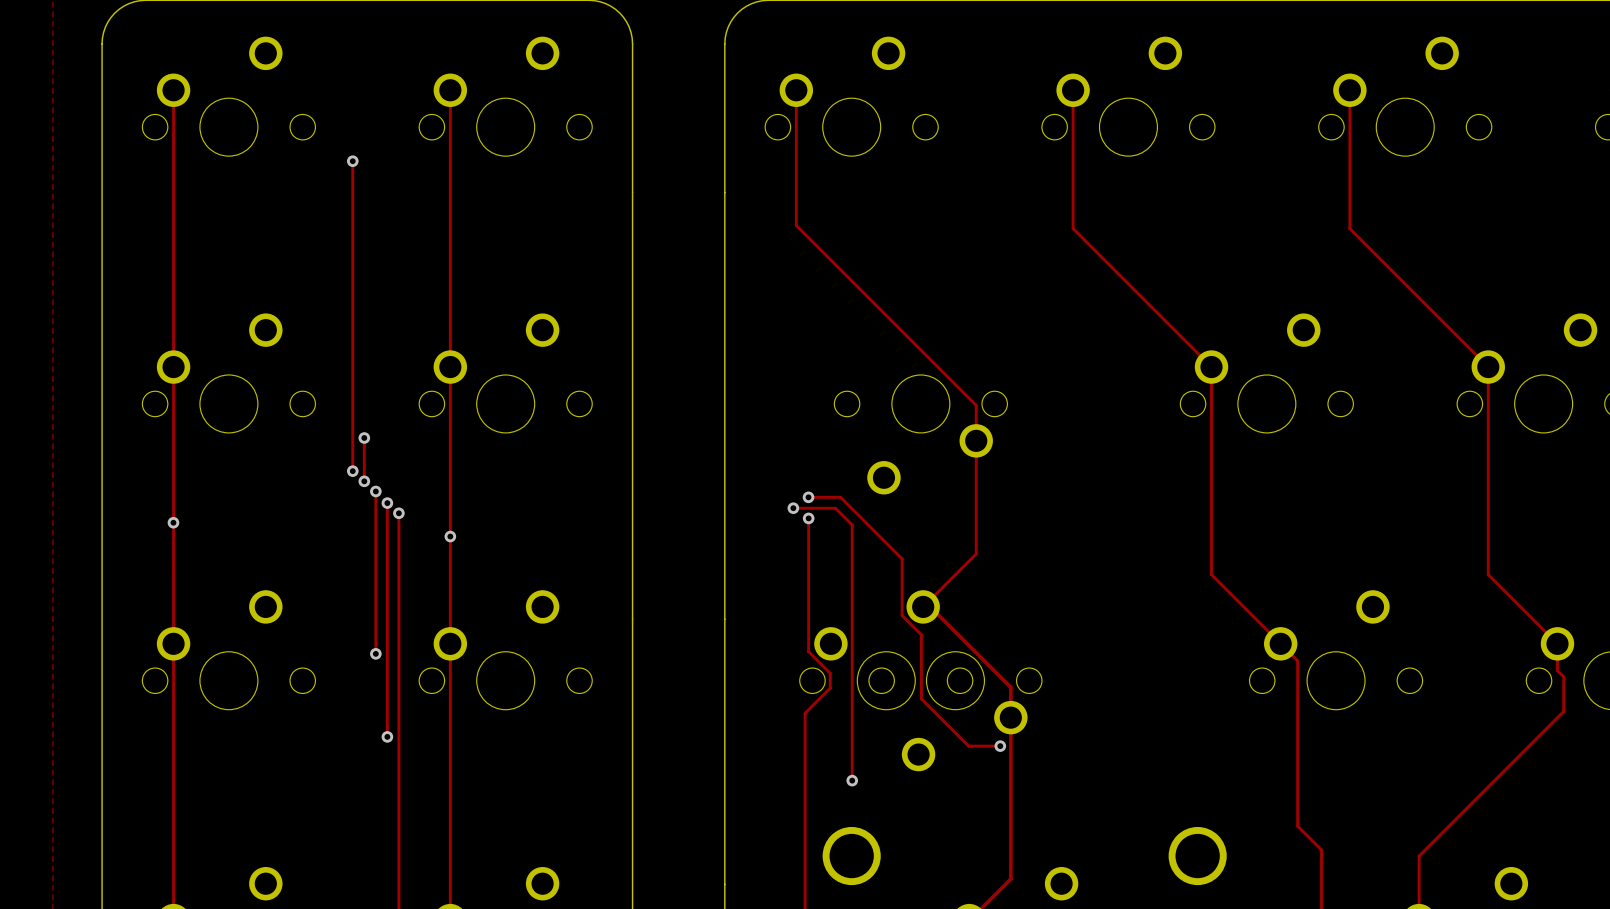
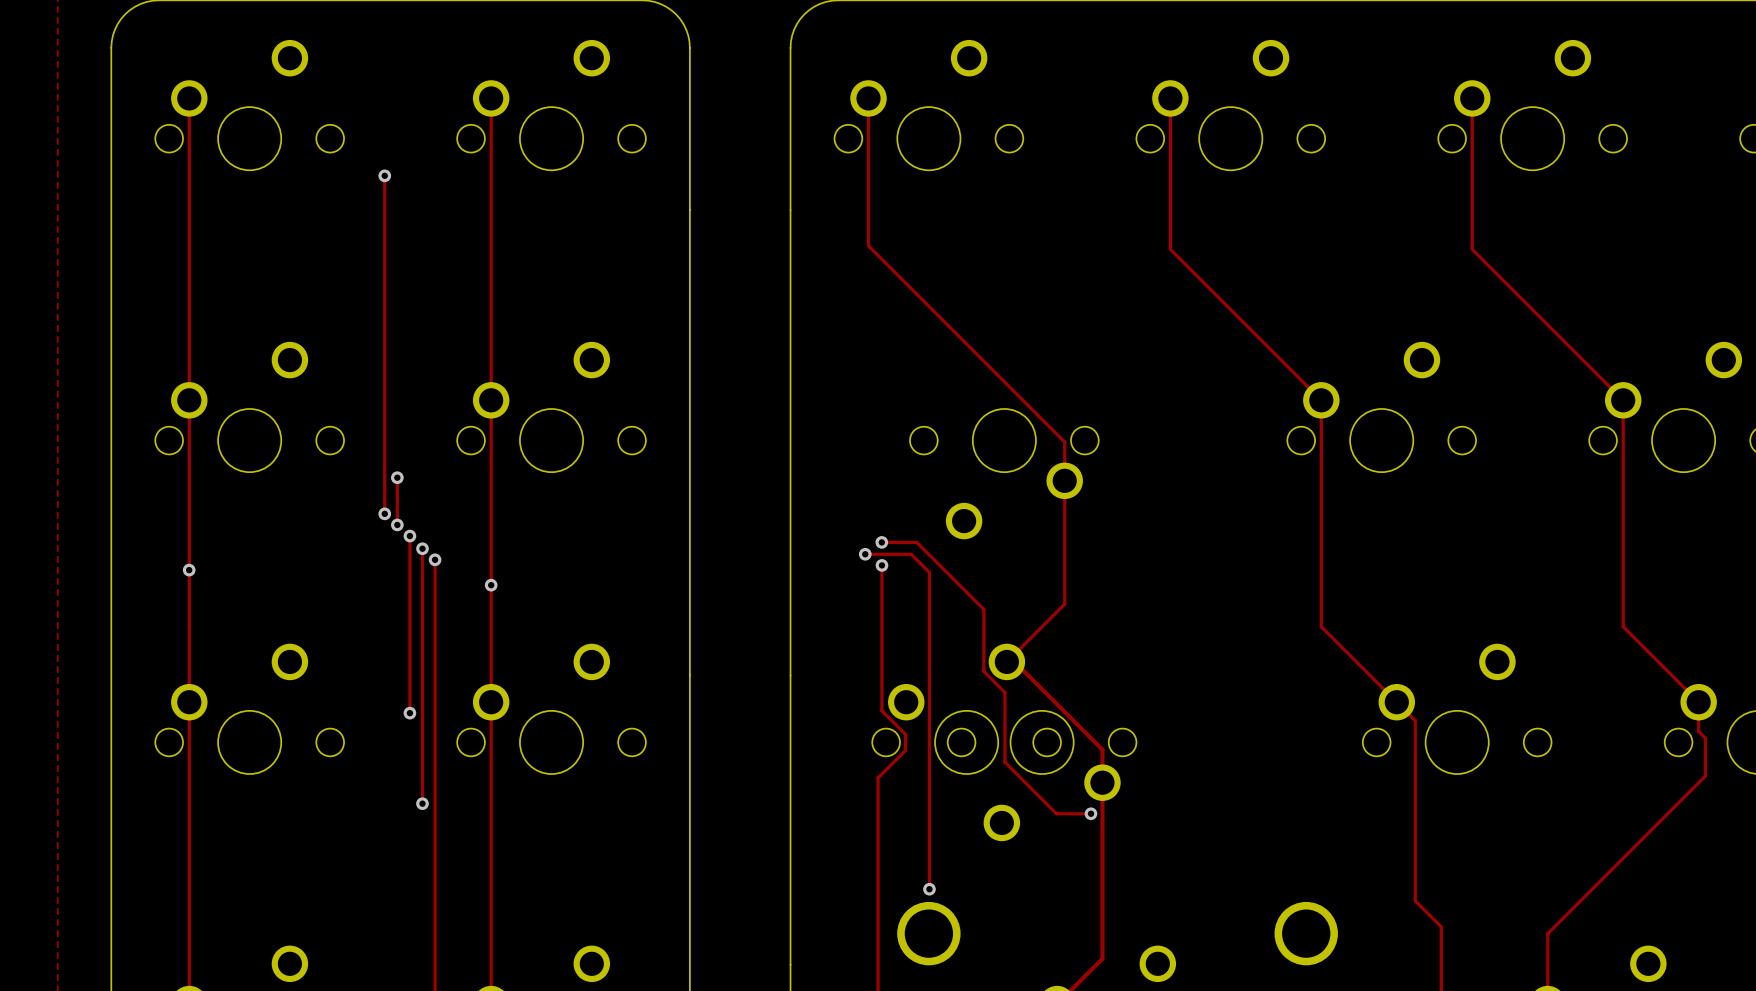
track: none -> (929, 851) (929, 889)
via position: (852, 780) -> (929, 889)

